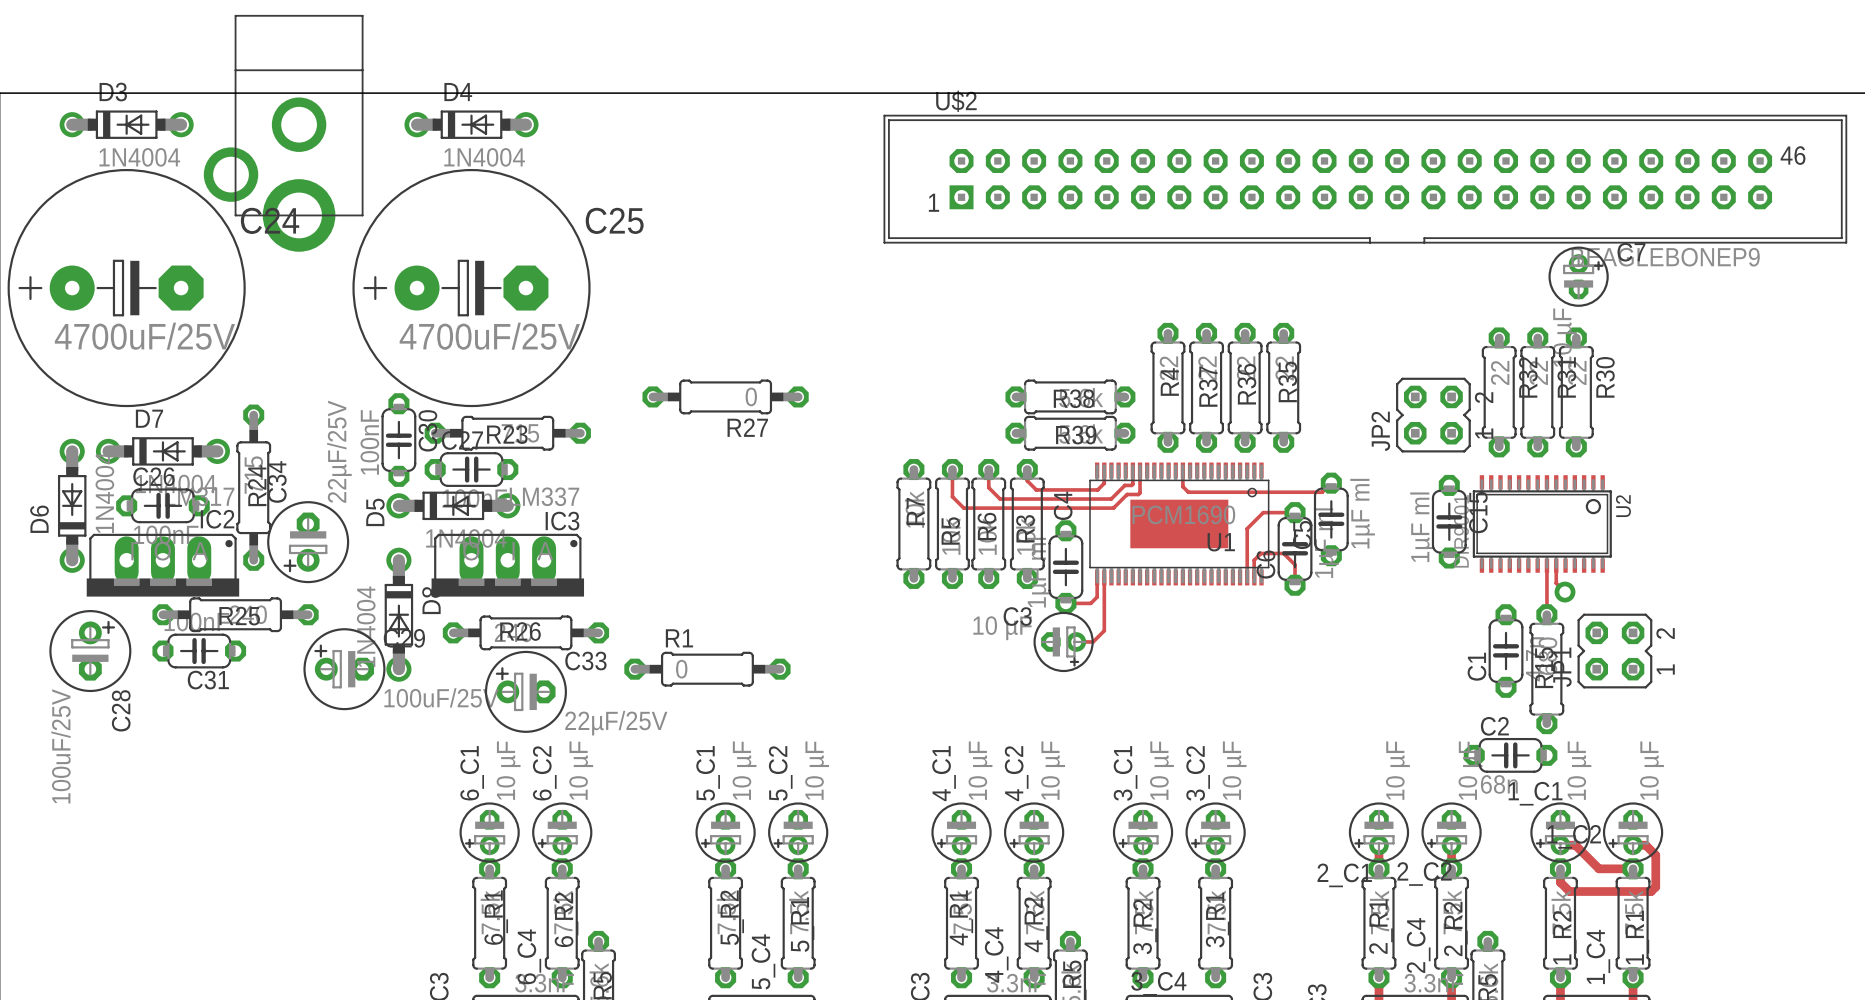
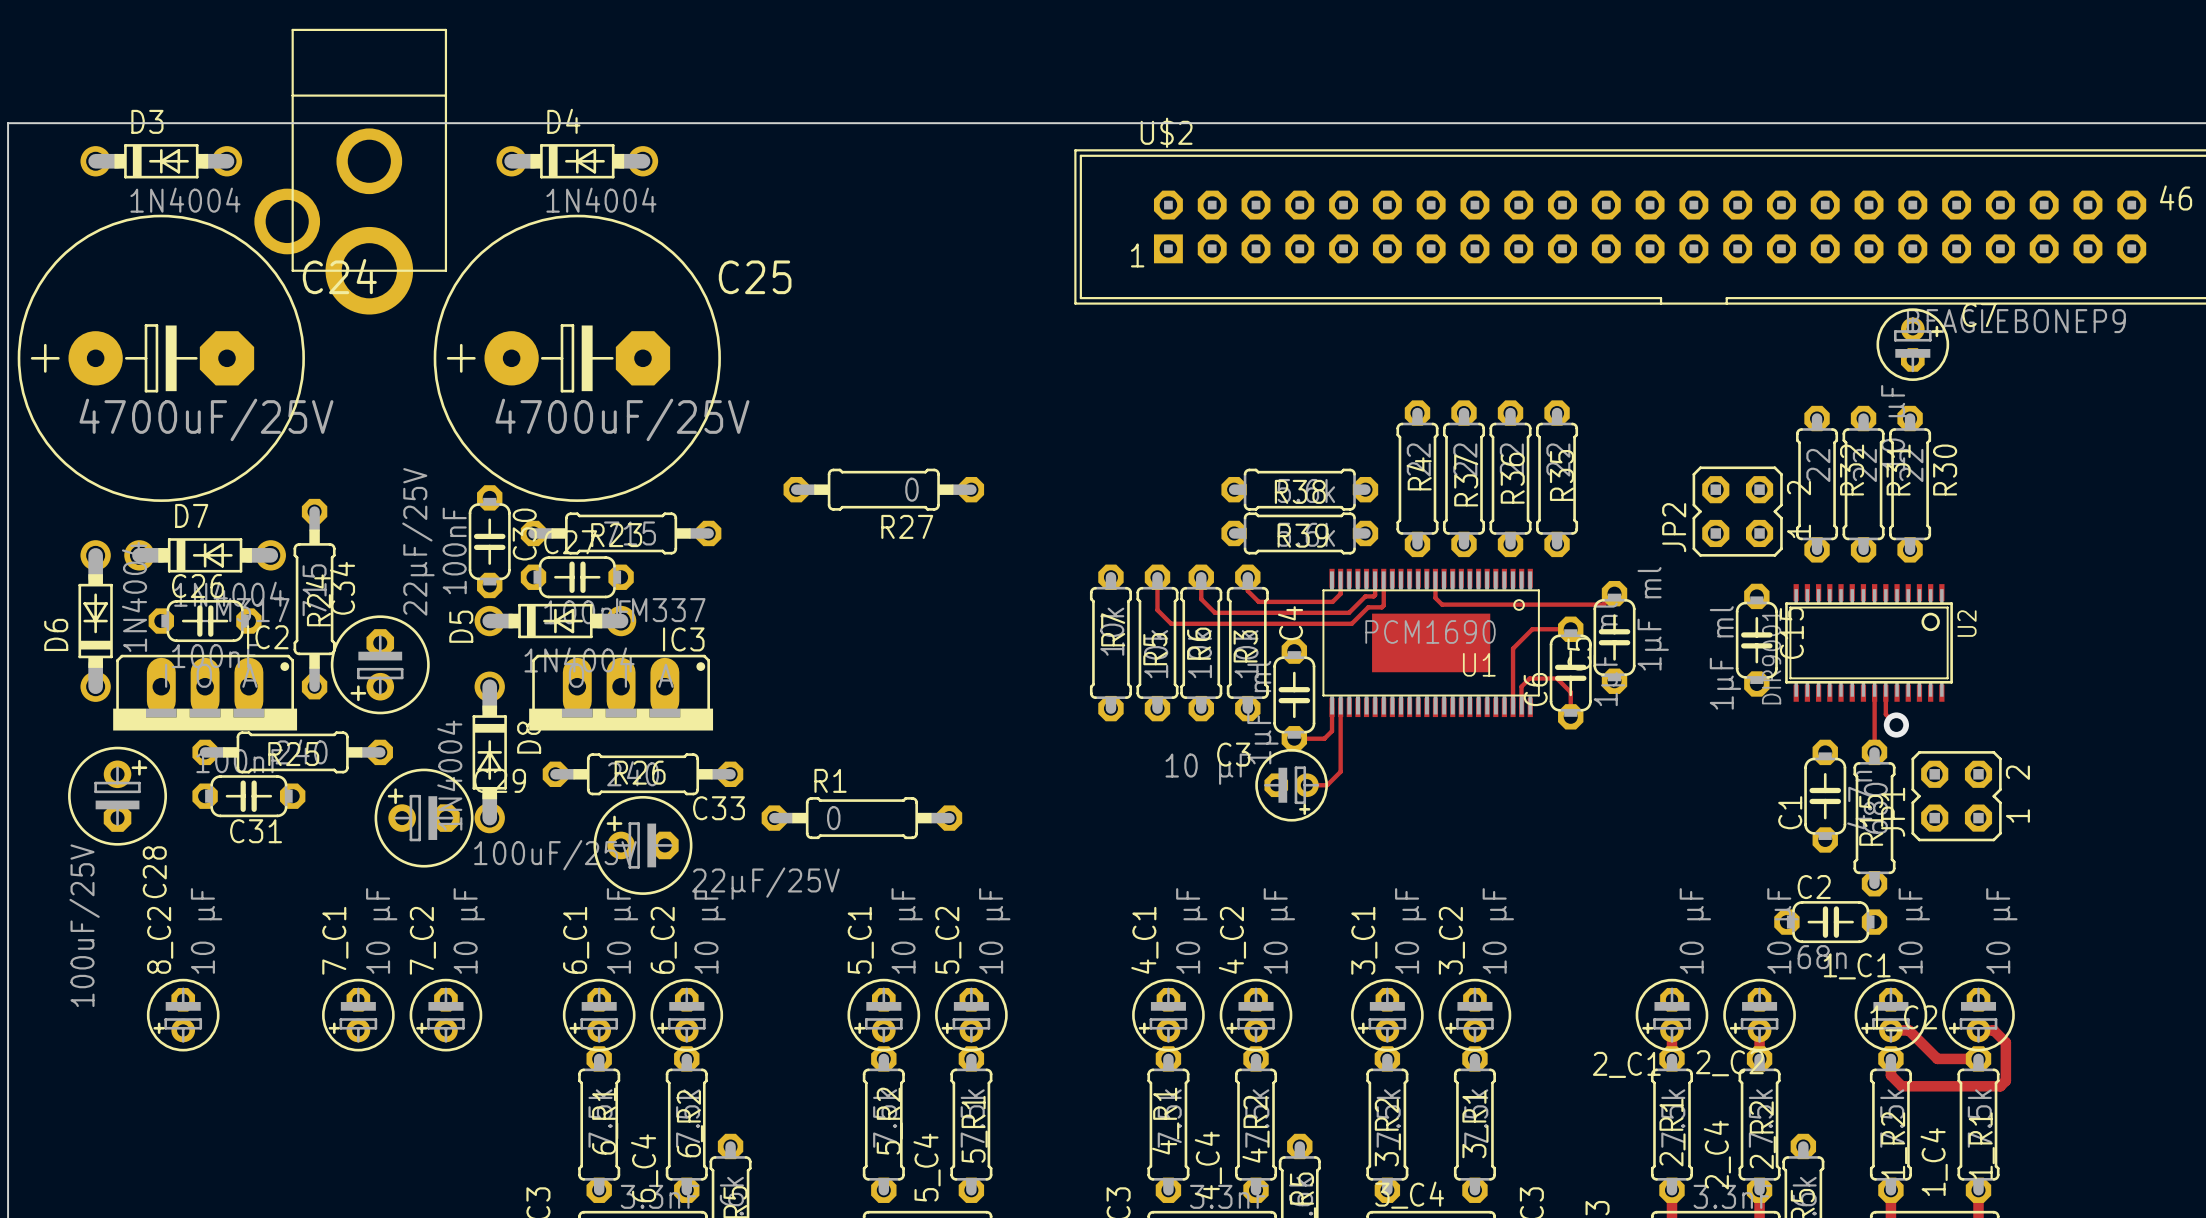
8_C2: none -> 10 µF (183, 1015)
7_C1: none -> 10 µF (358, 1015)
7_C2: none -> 10 µF (445, 1015)

